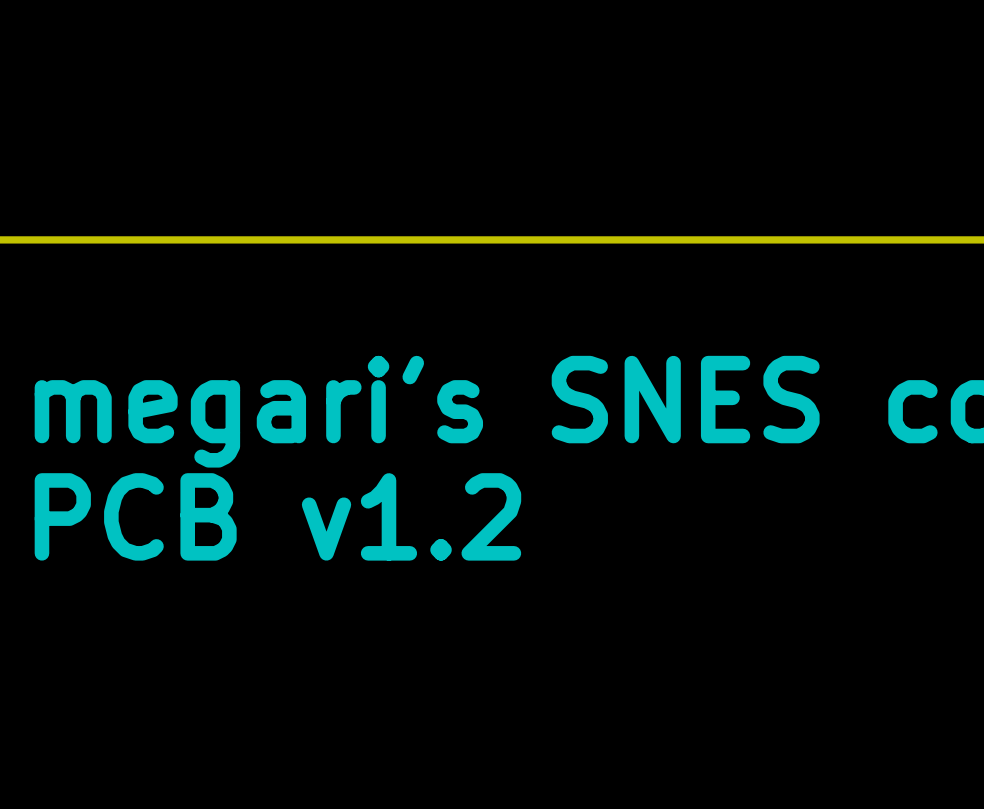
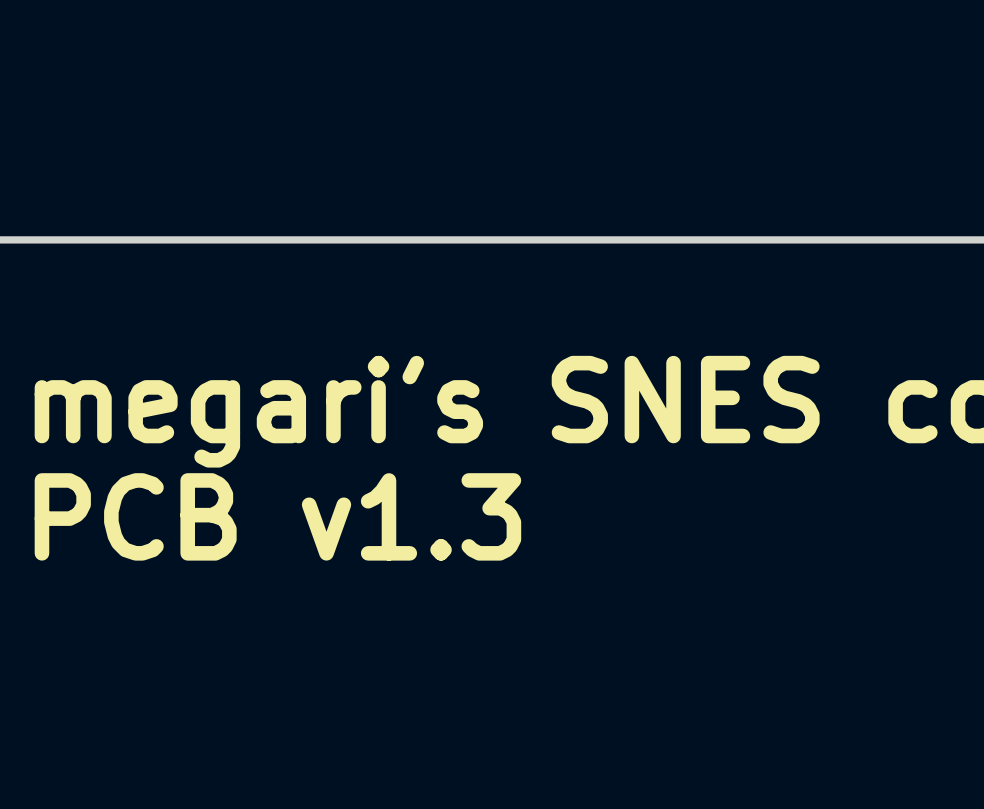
text: PCB v1.2 (277, 516) -> PCB v1.3 (277, 516)

